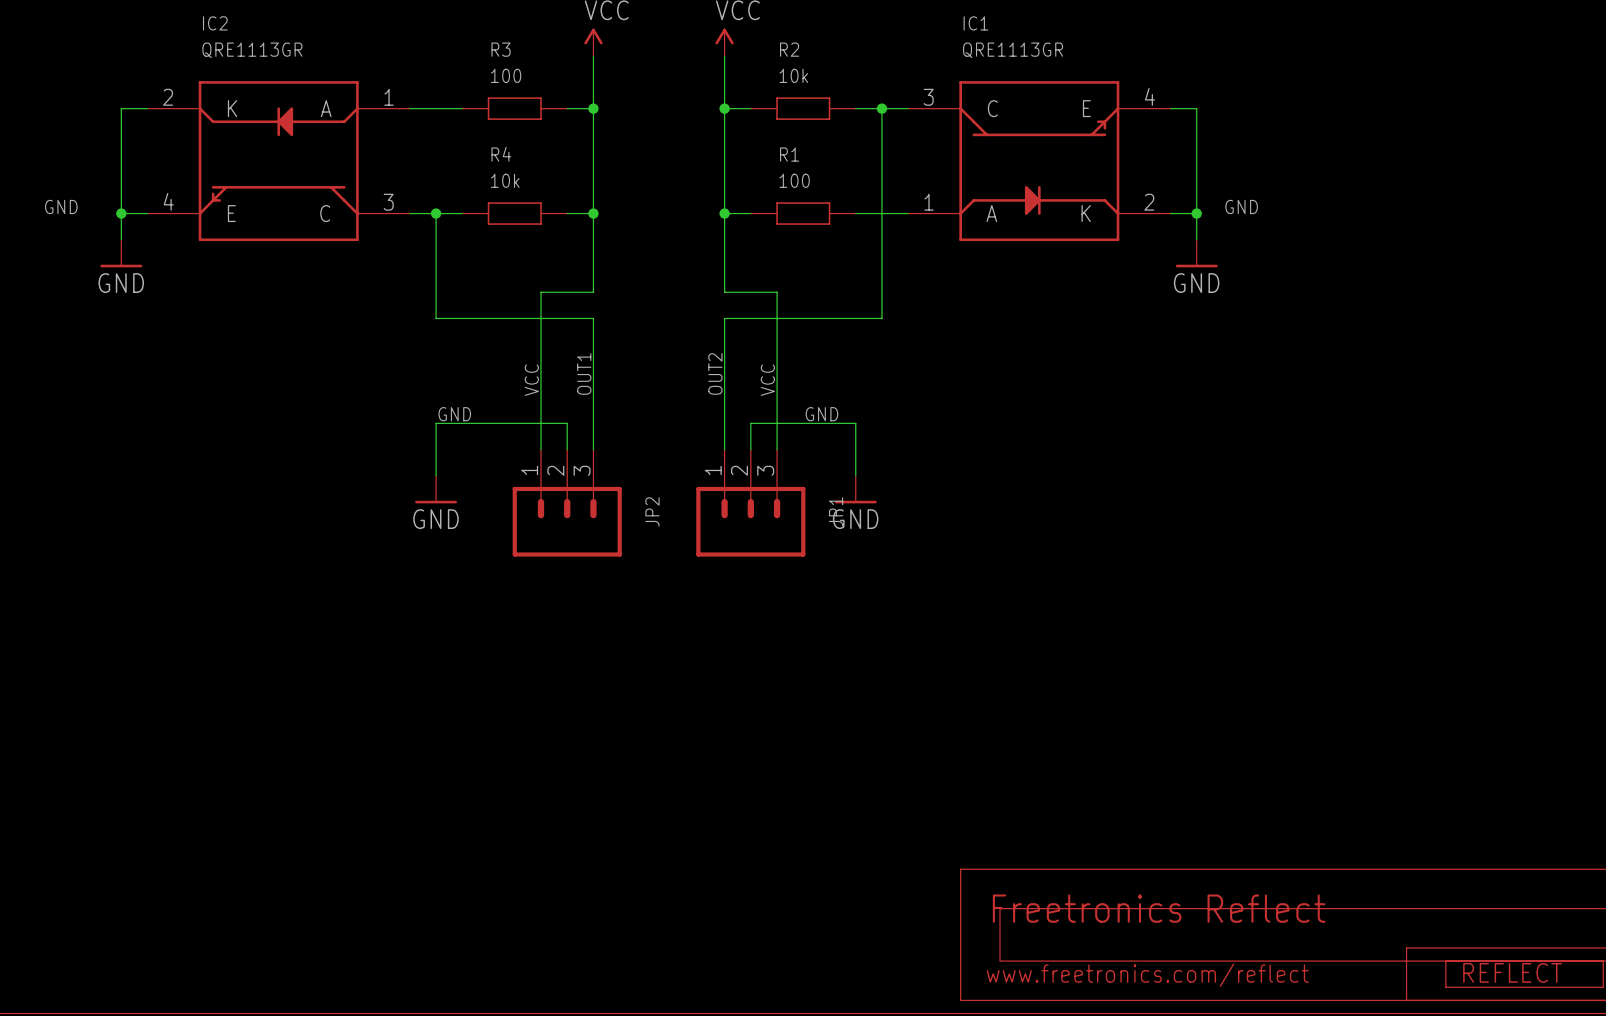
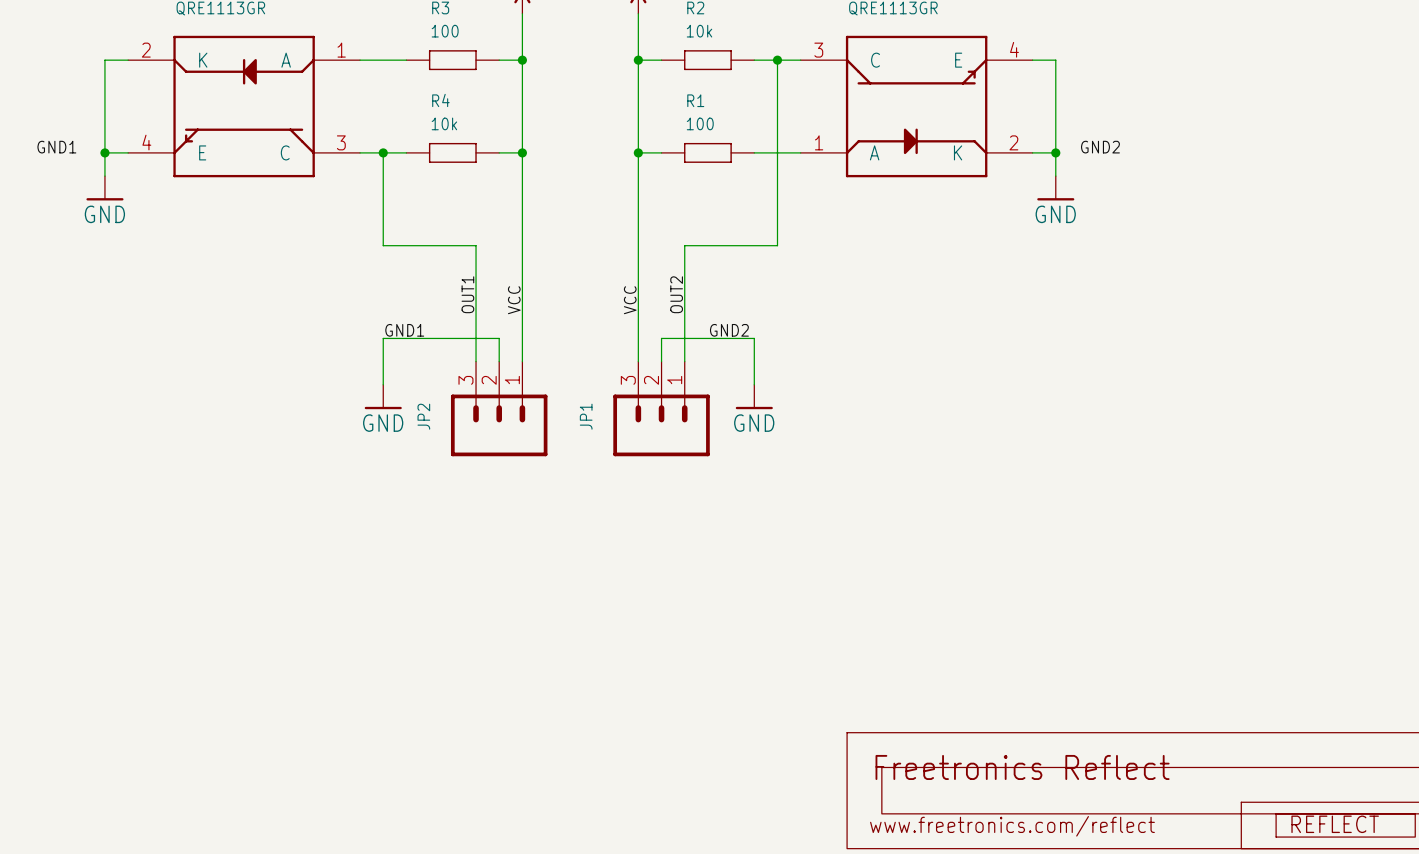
label: GND (61, 207) -> GND1 (56, 147)
label: GND (1241, 207) -> GND2 (1100, 147)
wire: (593, 292) (540, 292) (540, 318) (593, 318) -> (522, 222) (522, 245)
wire: (724, 292) (777, 292) (777, 318) (724, 318) -> (638, 222) (638, 245)
label: OUT1 (584, 373) -> VCC (514, 300)
label: OUT2 (715, 373) -> VCC (630, 300)
label: VCC (531, 380) -> OUT1 (467, 294)
label: VCC (767, 380) -> OUT2 (676, 294)
label: GND (454, 414) -> GND1 (404, 330)
label: GND (821, 414) -> GND2 (729, 330)
JP2 flip: as is (567, 521) -> left-right (499, 425)
JP1 flip: as is (750, 521) -> left-right (661, 425)

